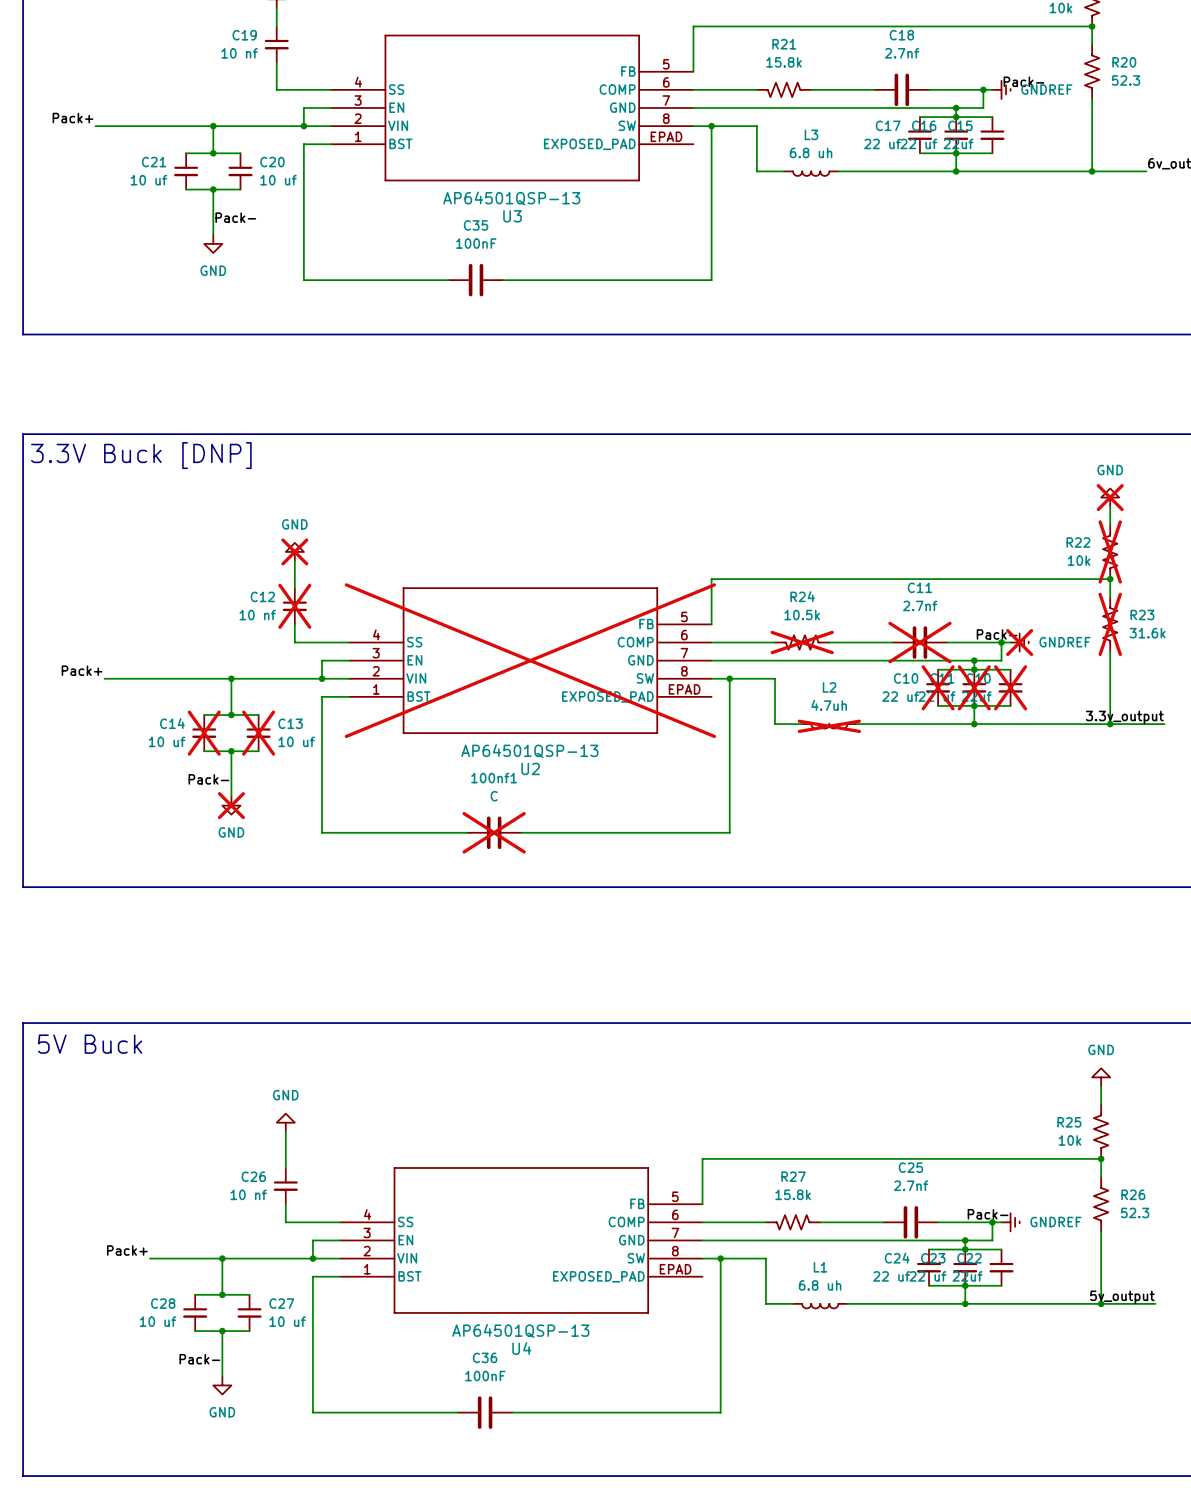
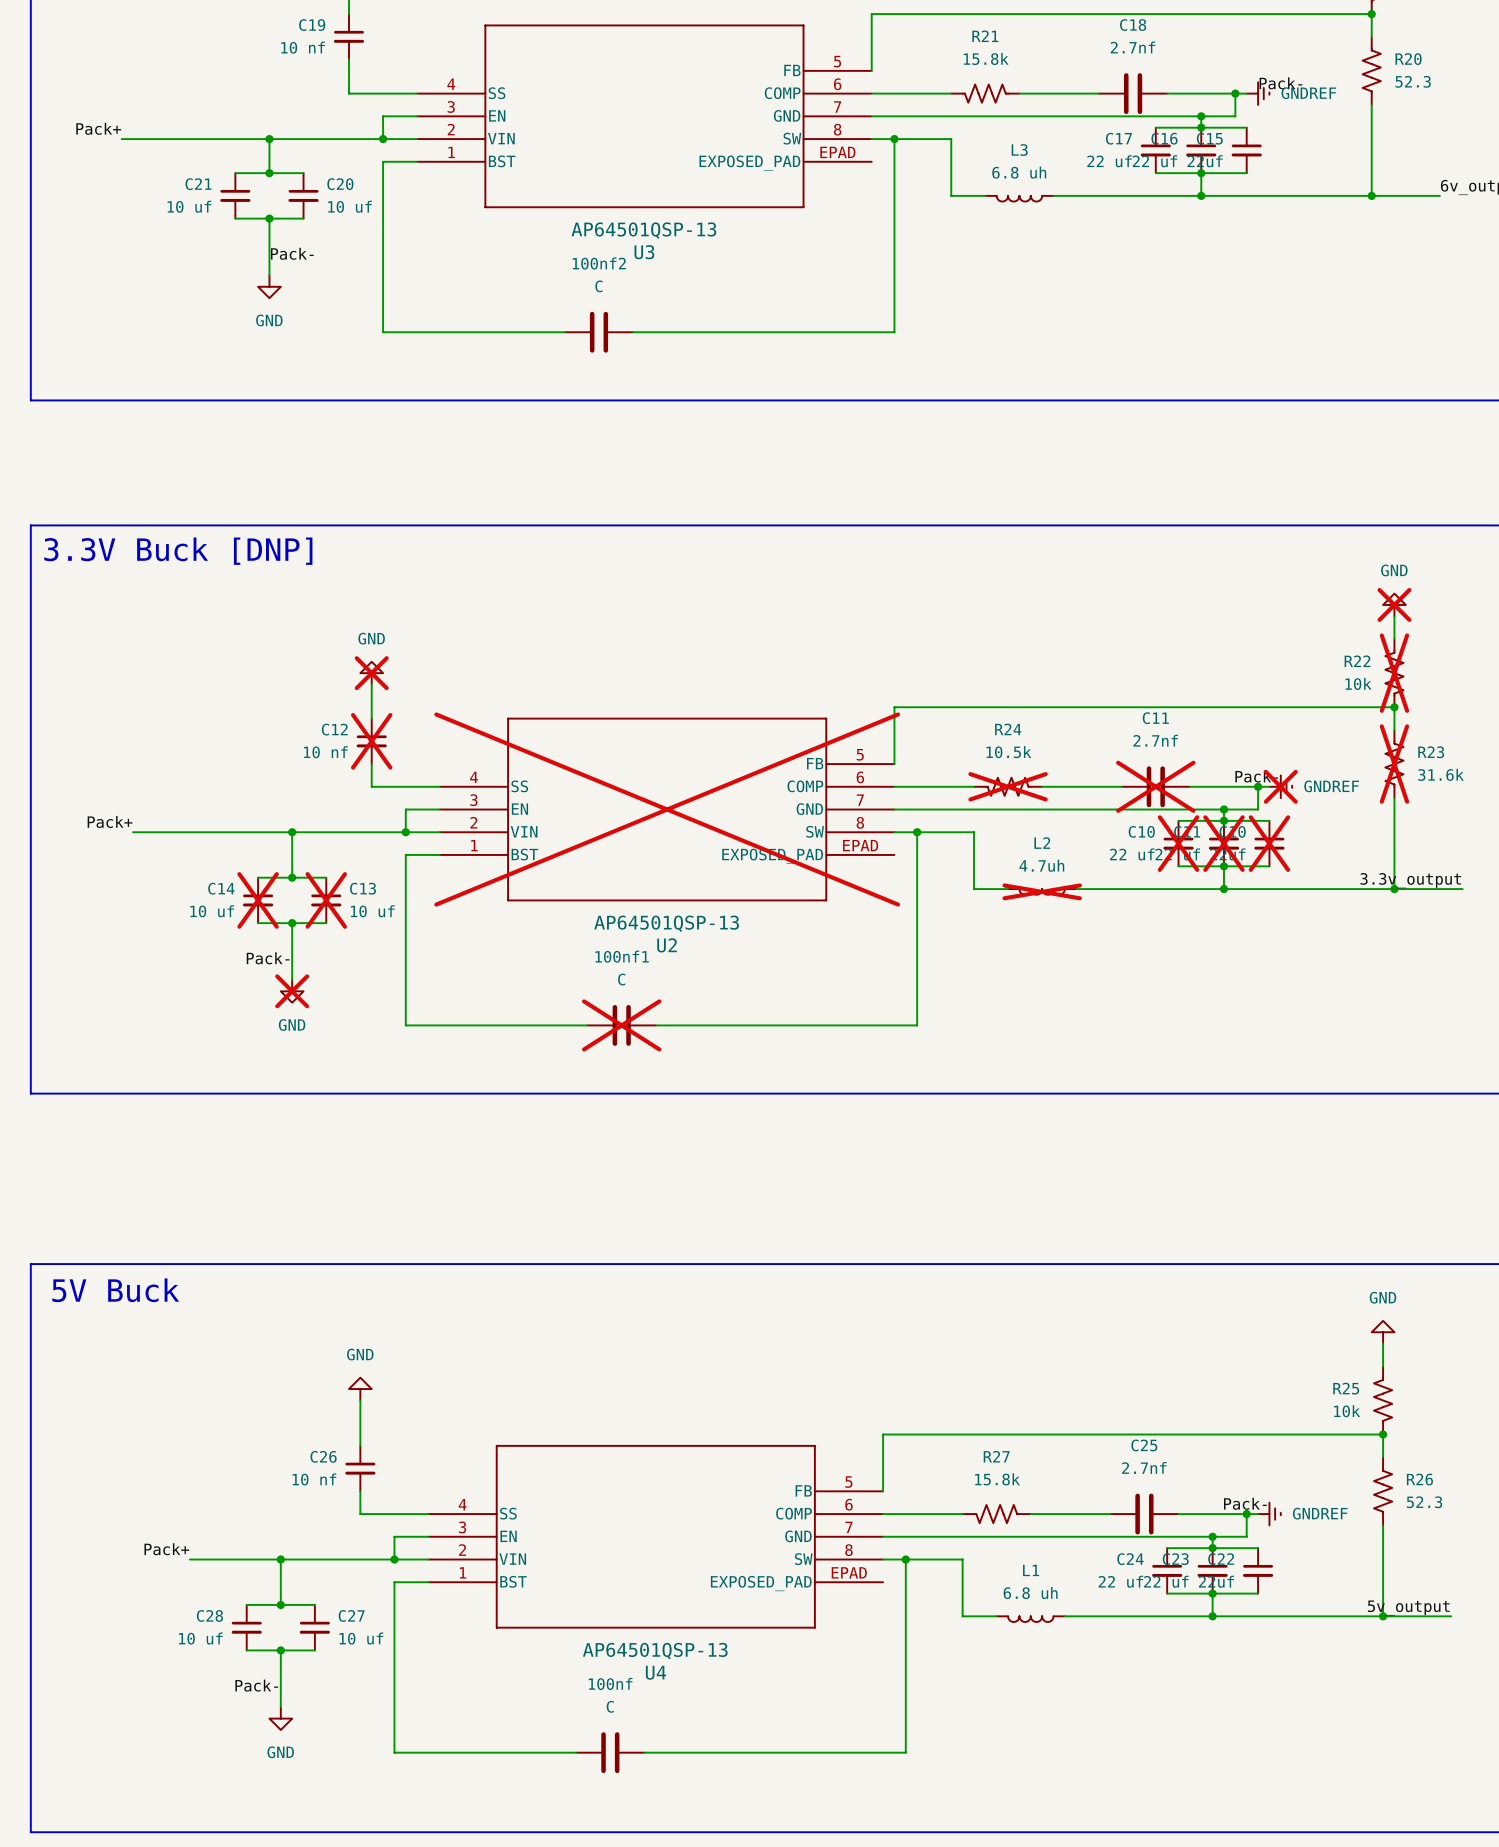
C35 name: C35 (476, 225) -> 100nf2 (599, 263)
C35 value: 100nF (476, 243) -> C (598, 286)
C36 name: C36 (485, 1357) -> 100nf (610, 1683)
C36 value: 100nF (485, 1376) -> C (610, 1706)

